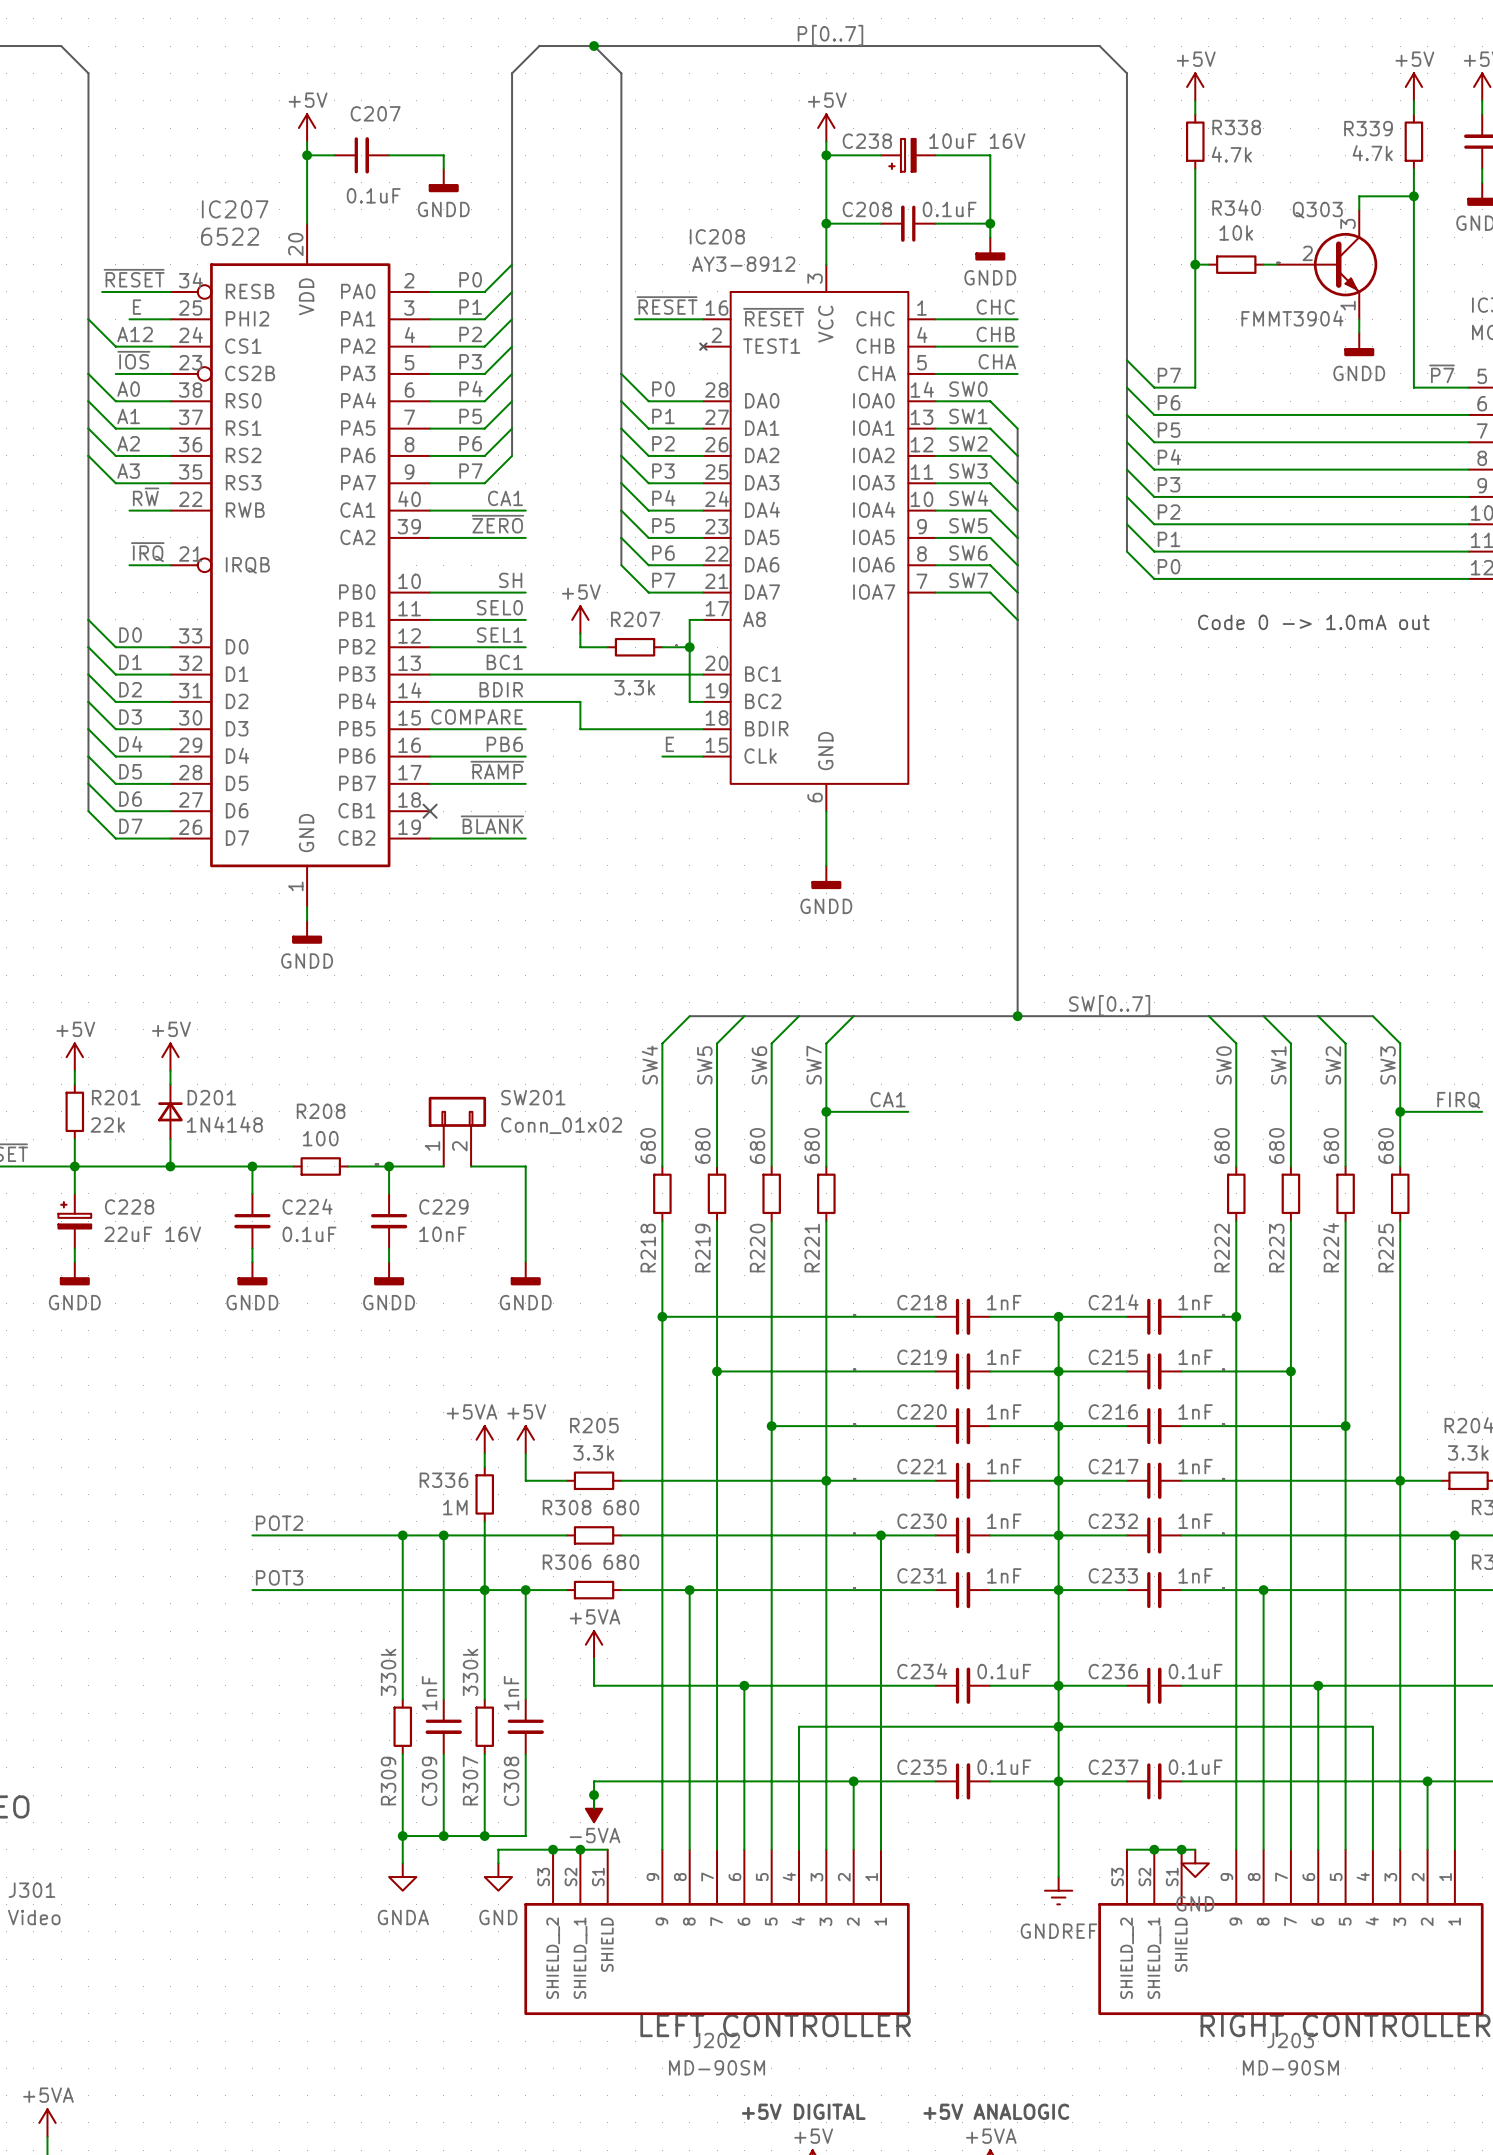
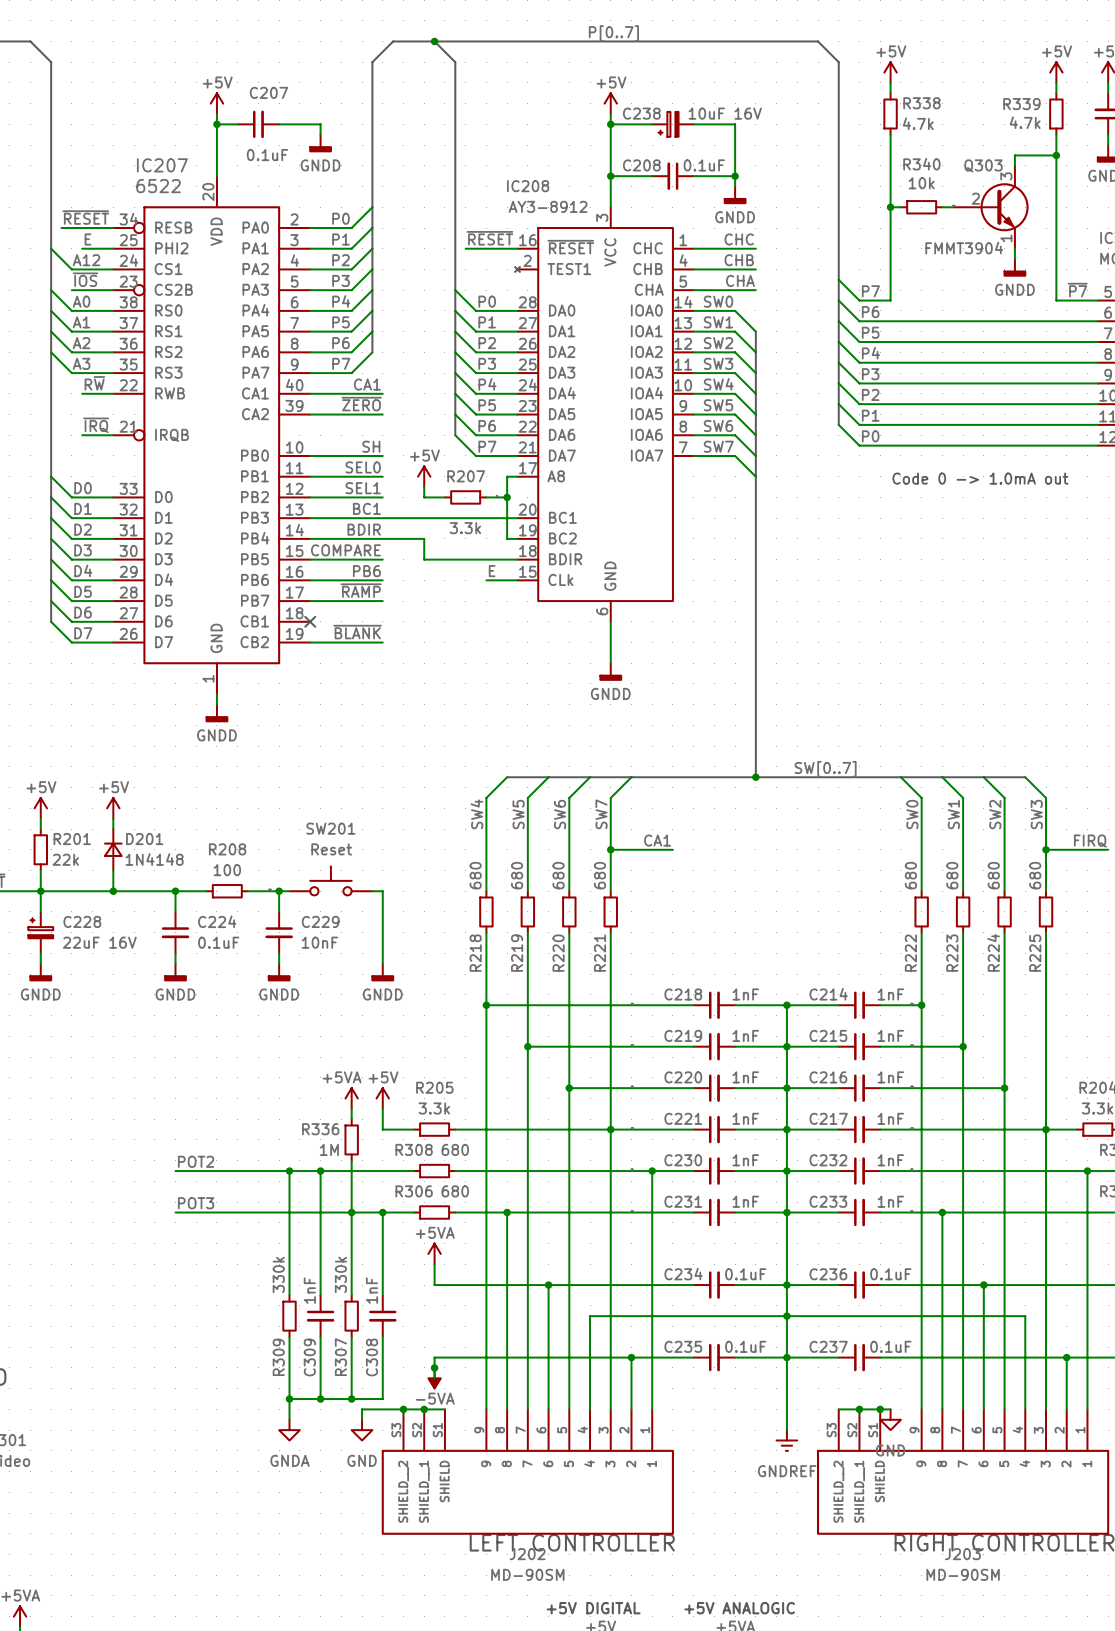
SW201 symbol: [428, 1096, 487, 1167] -> [289, 866, 373, 896]
SW201 name position: SW201 (533, 1097) -> SW201 (330, 828)
SW201 value: Conn_01x02 (561, 1125) -> Reset (331, 849)

